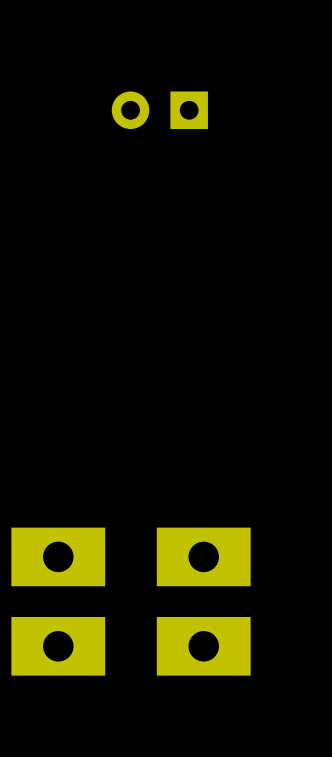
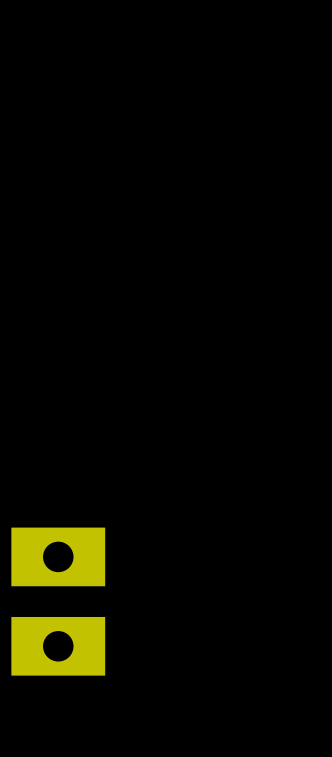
part: (159, 110) -> none
part: (203, 601) -> none

